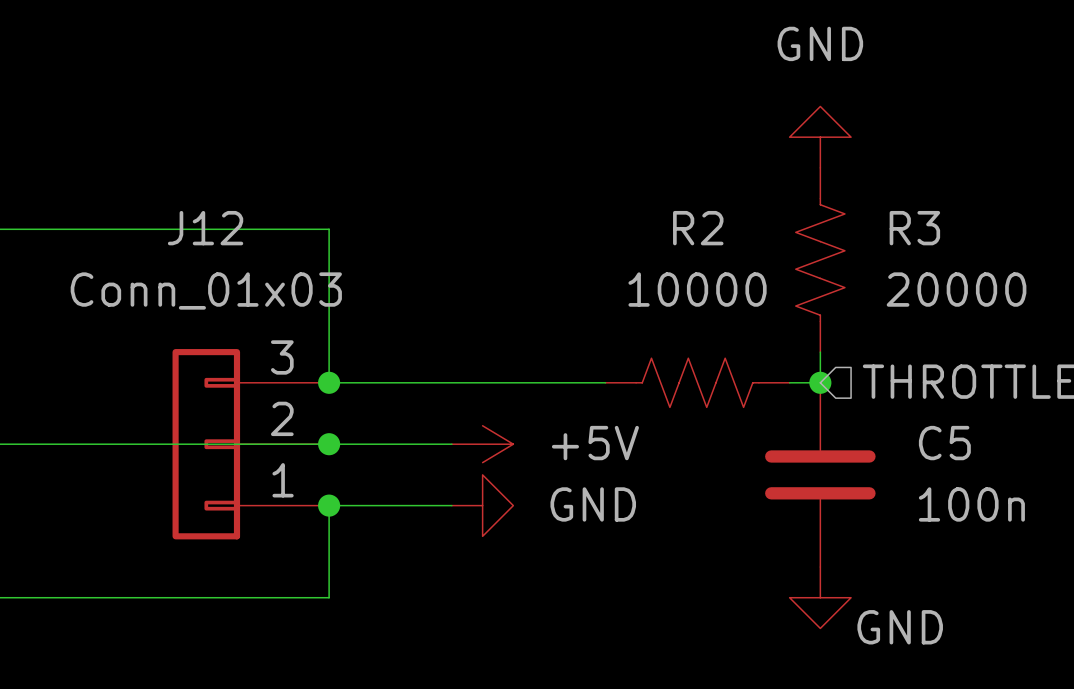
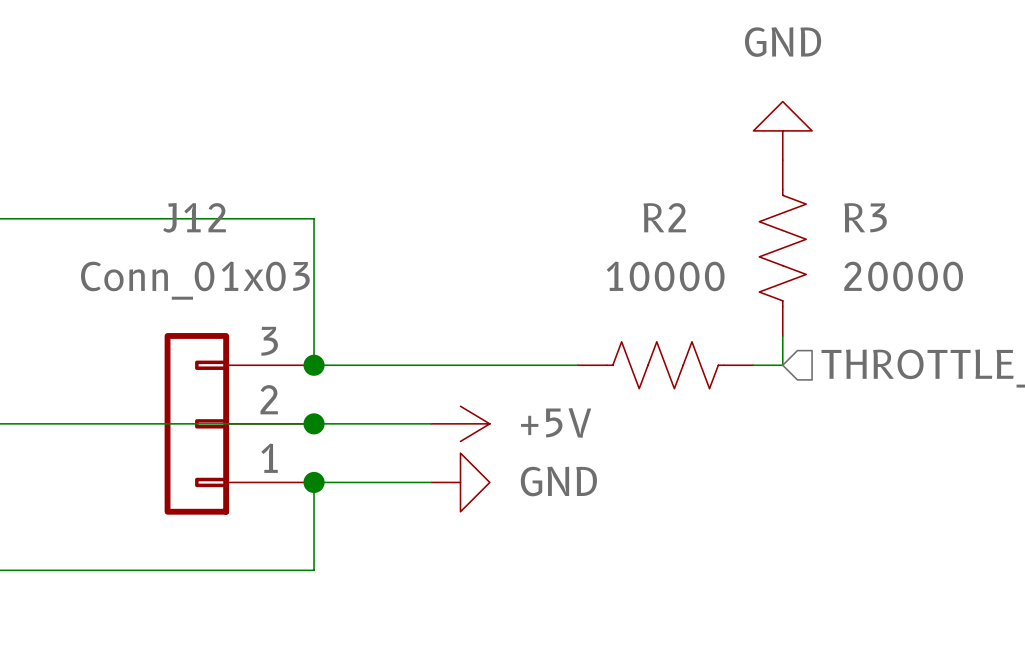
junction: (820, 382) -> none
C5: 100n (820, 474) -> none
power symbol: GND (820, 597) -> none

